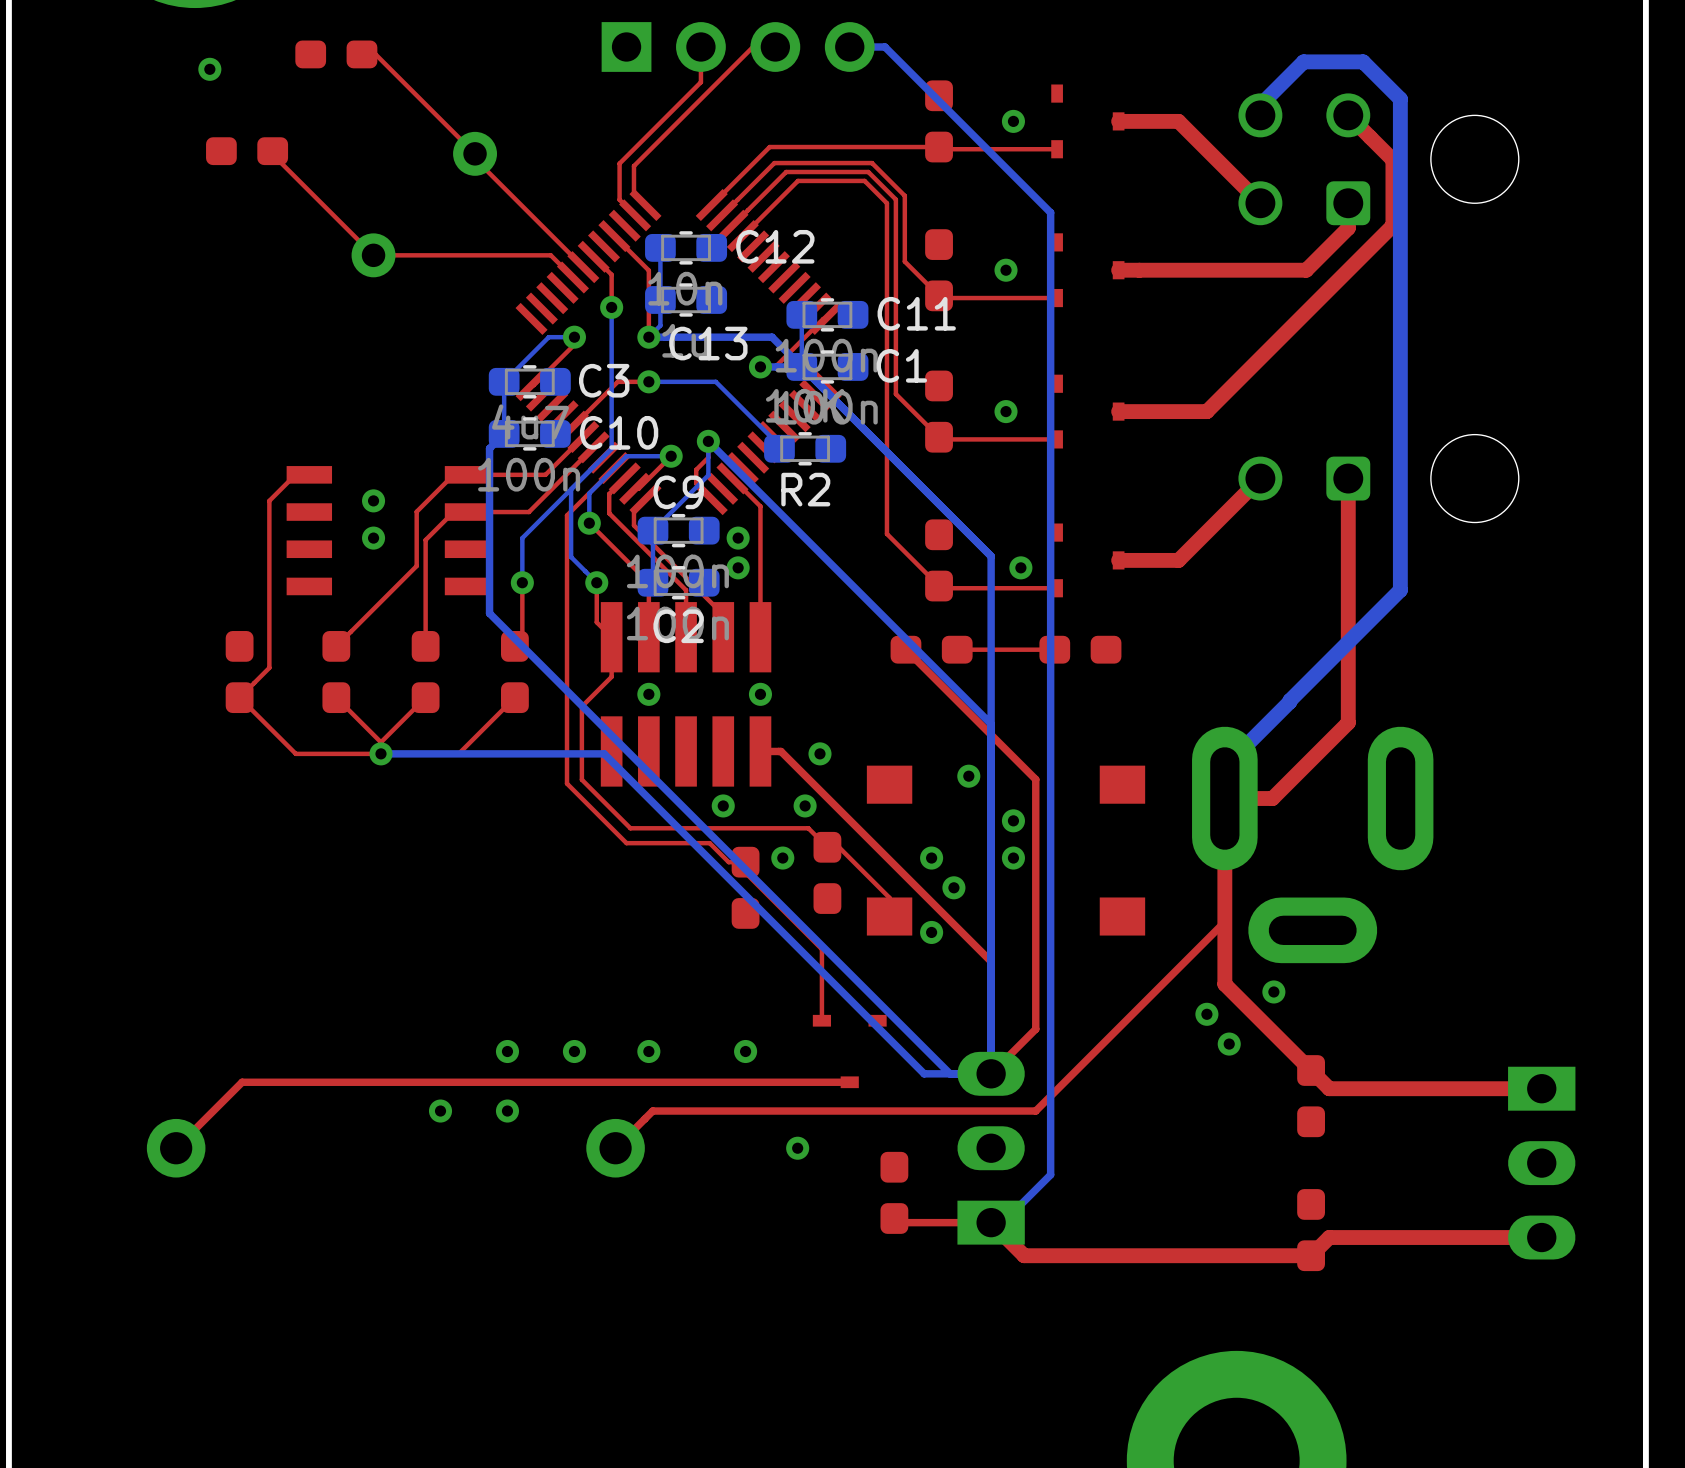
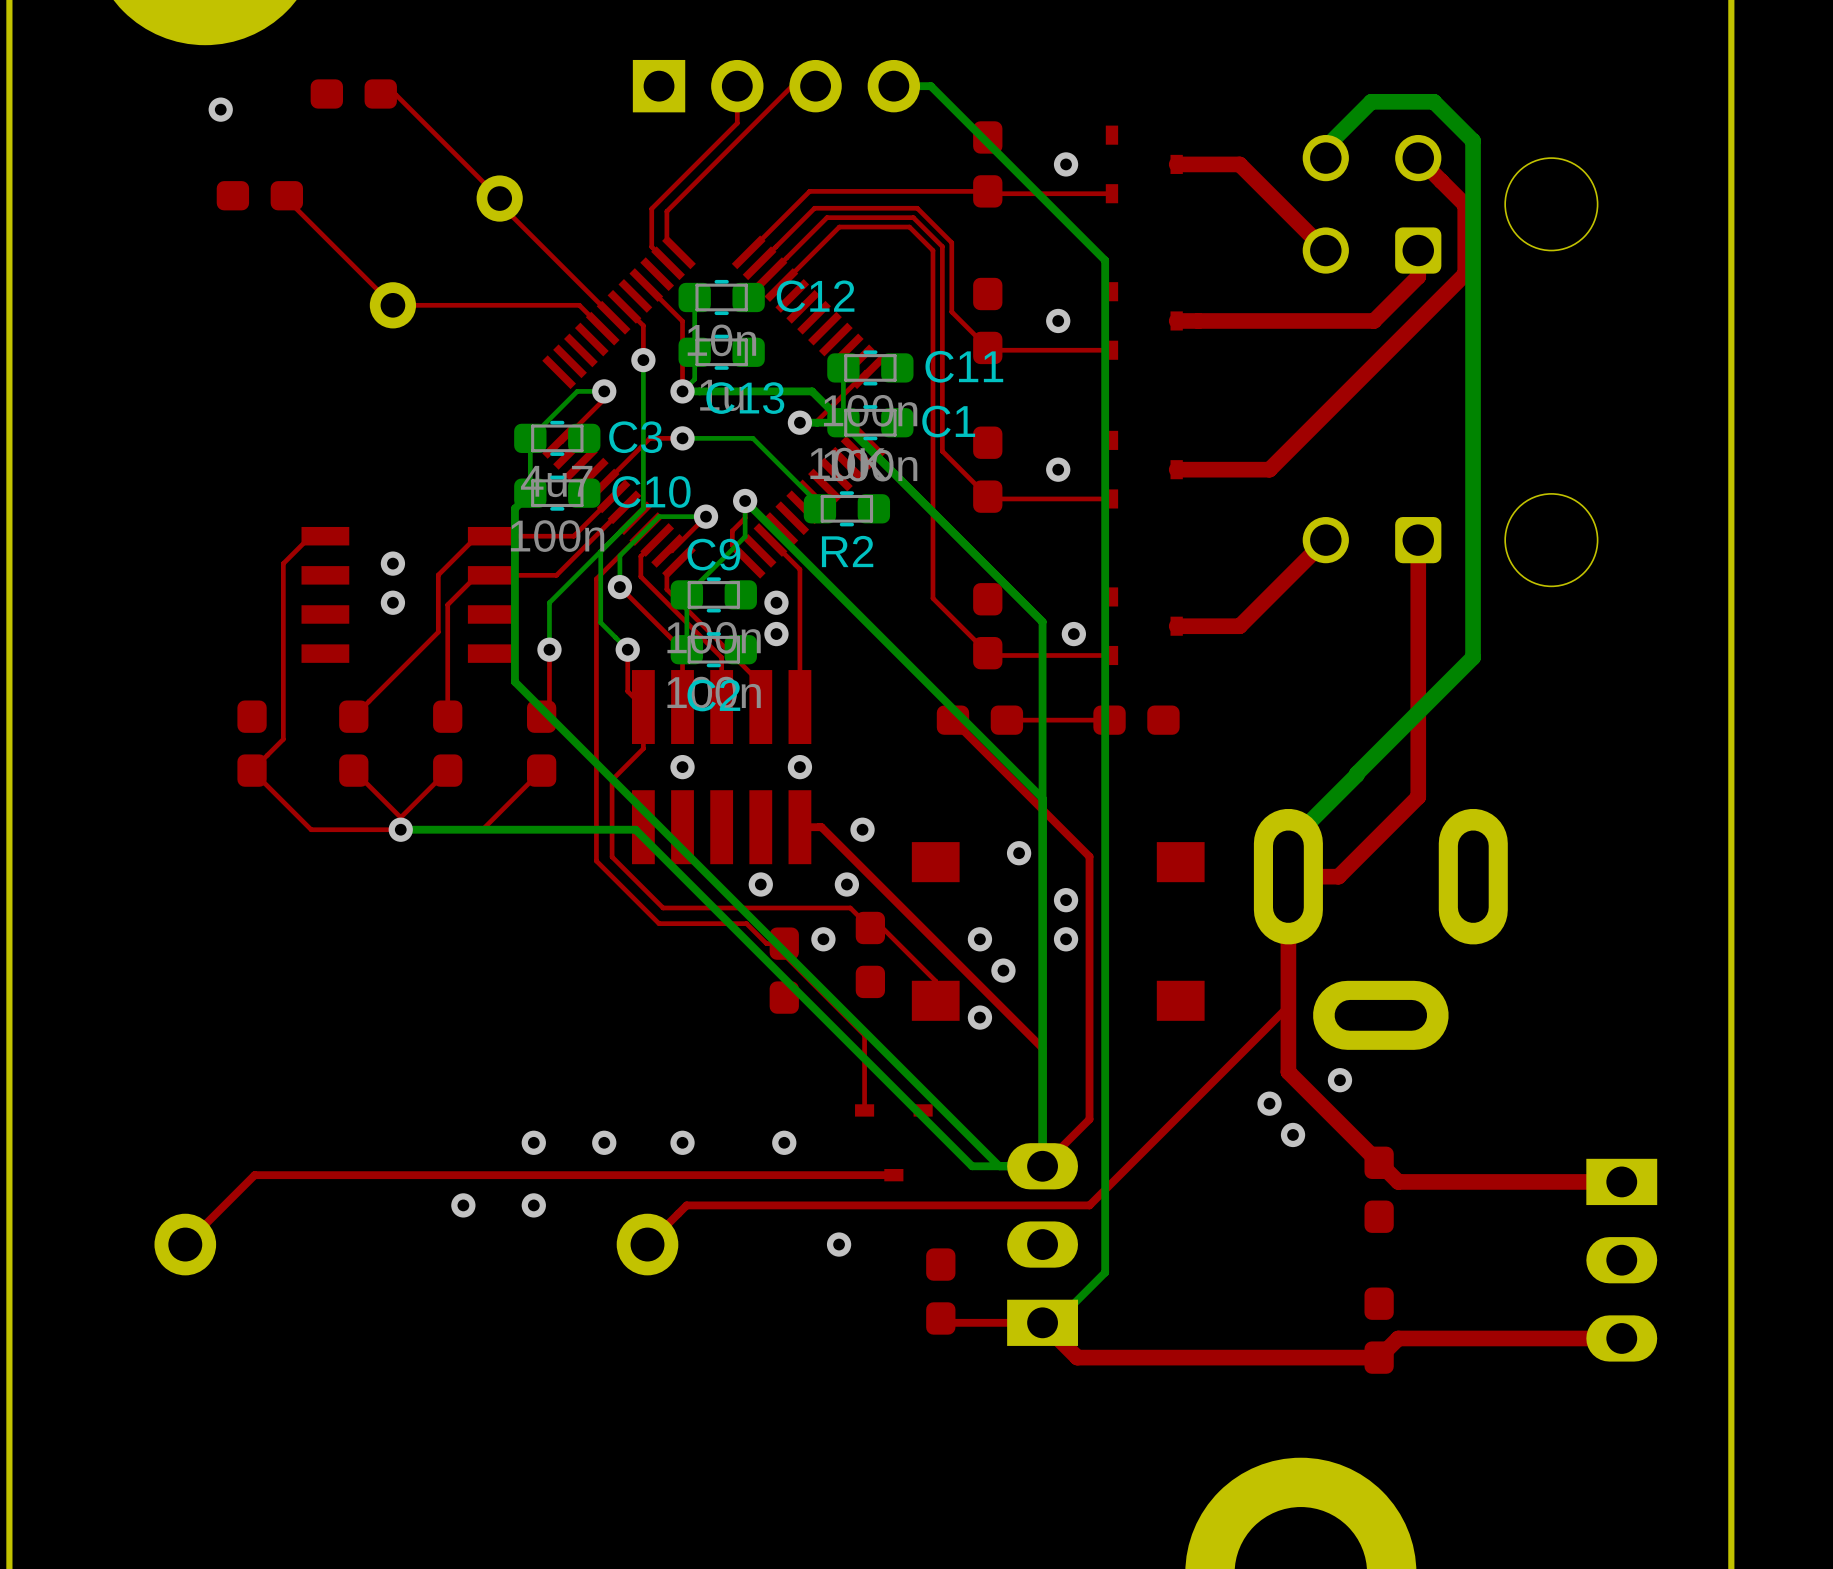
part footprint: [1192, 726, 1434, 964] -> [1253, 808, 1508, 1050]

